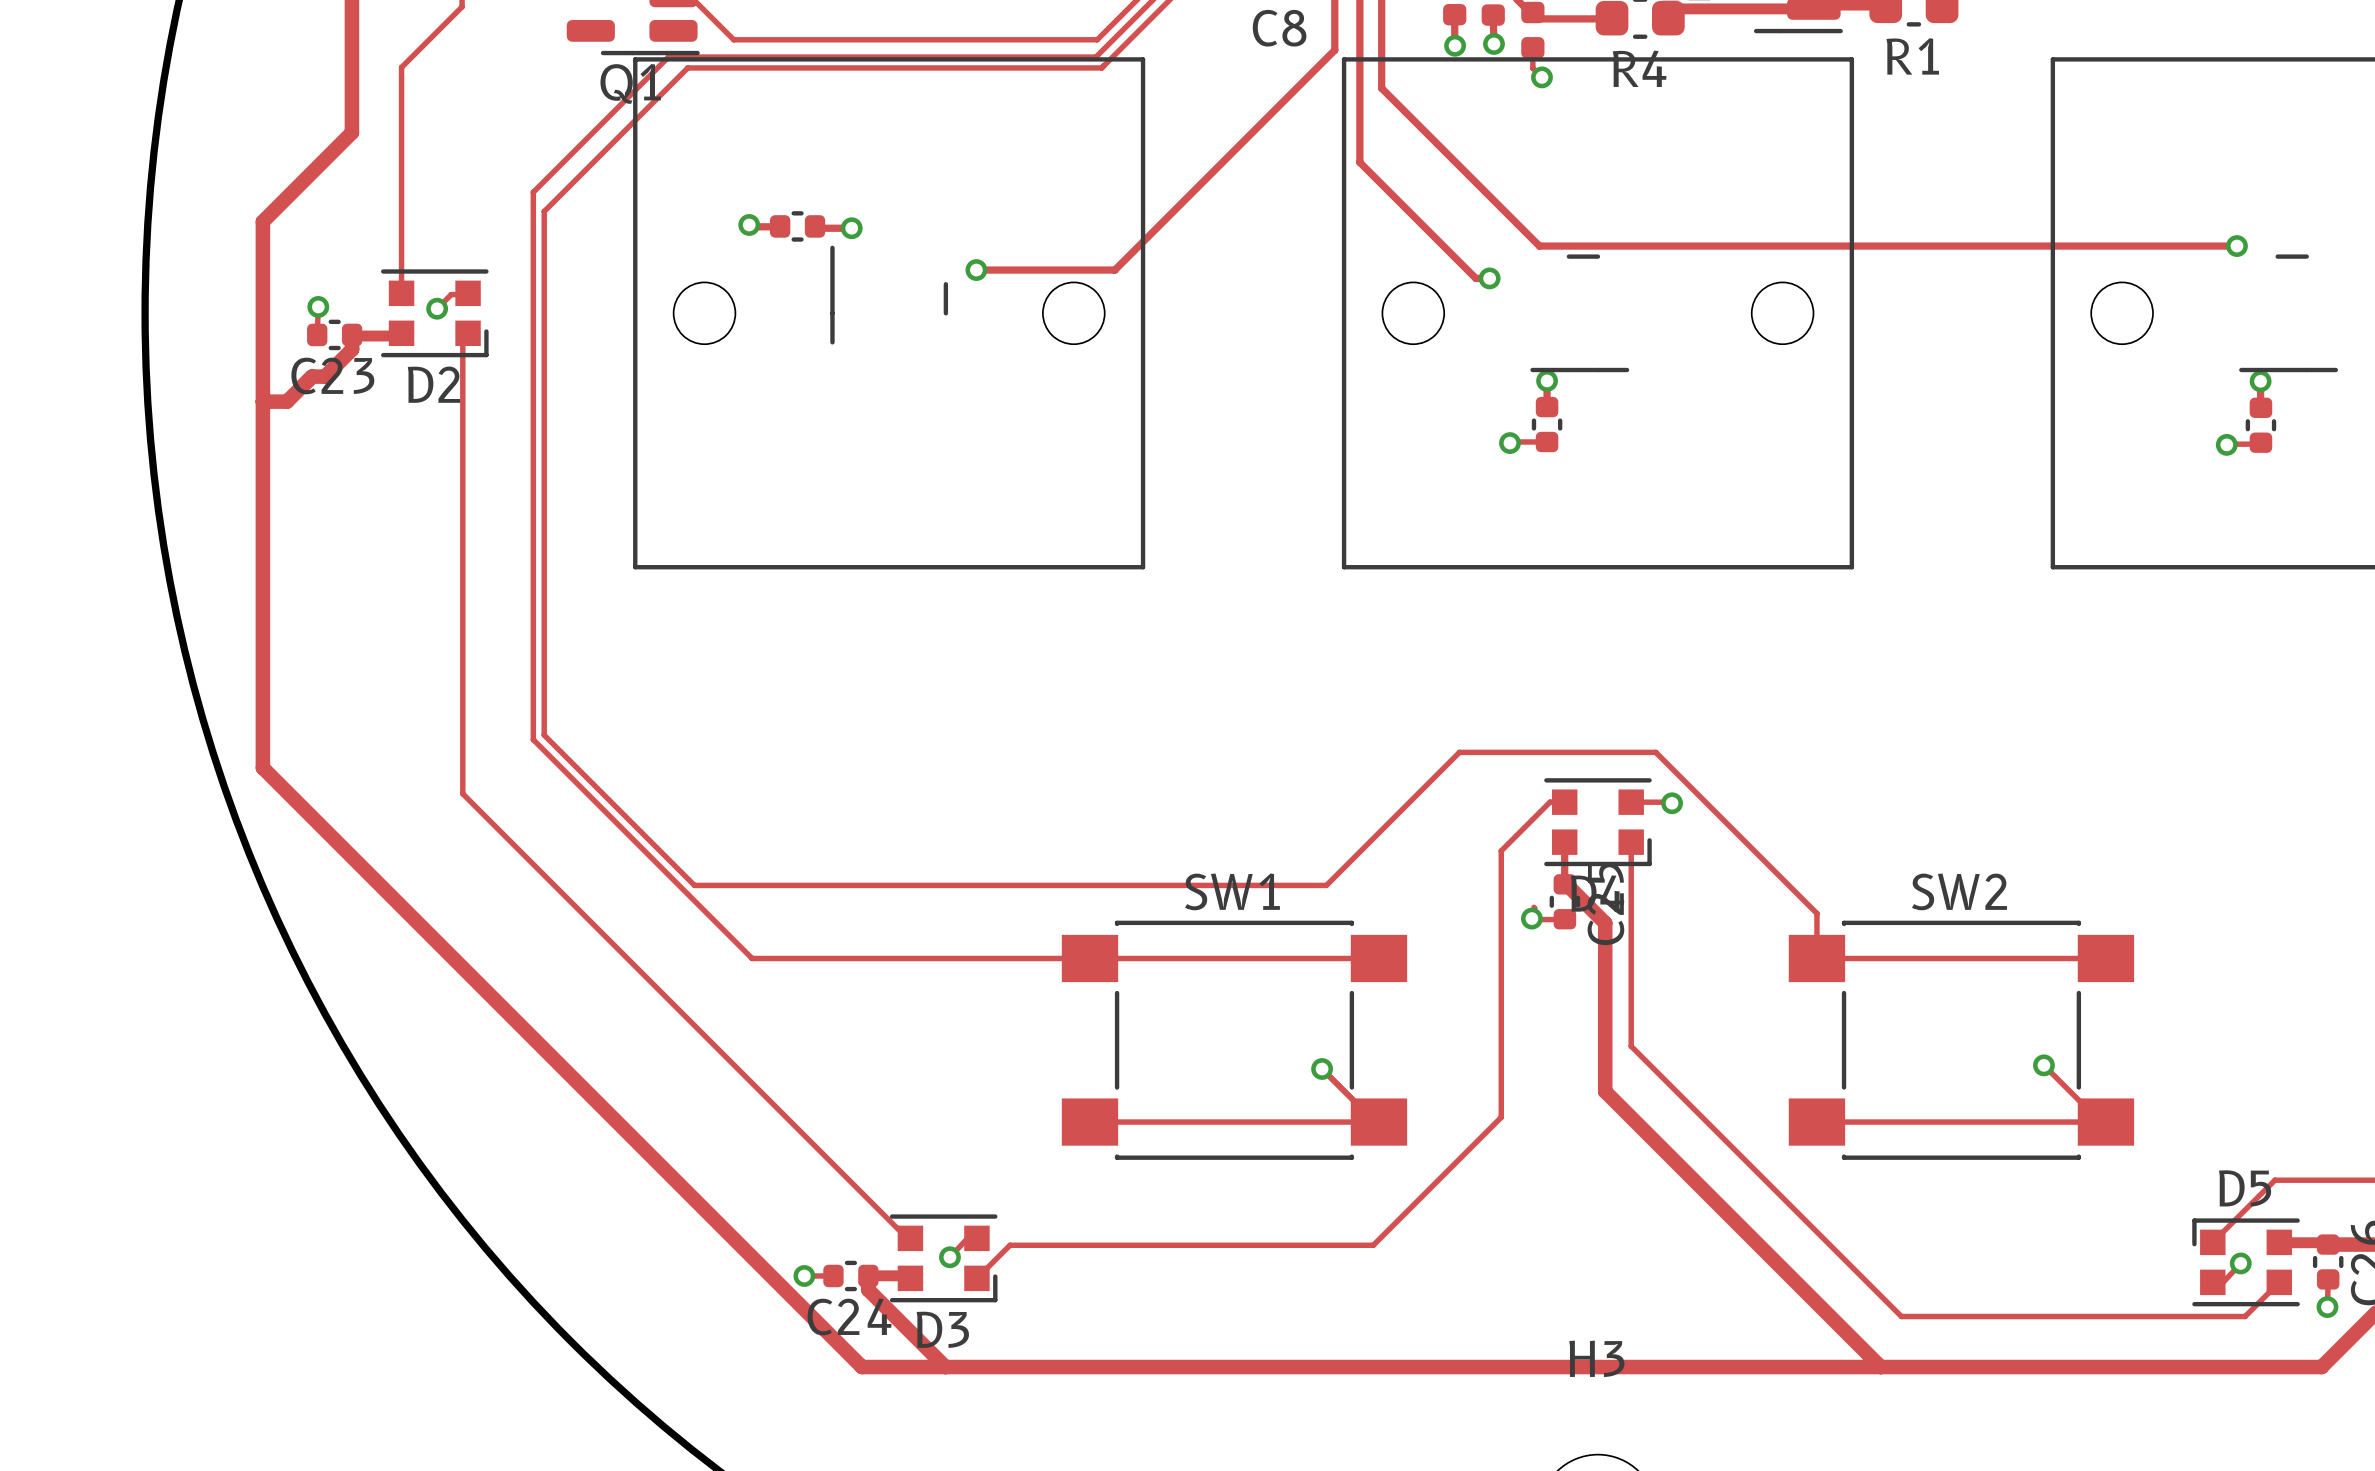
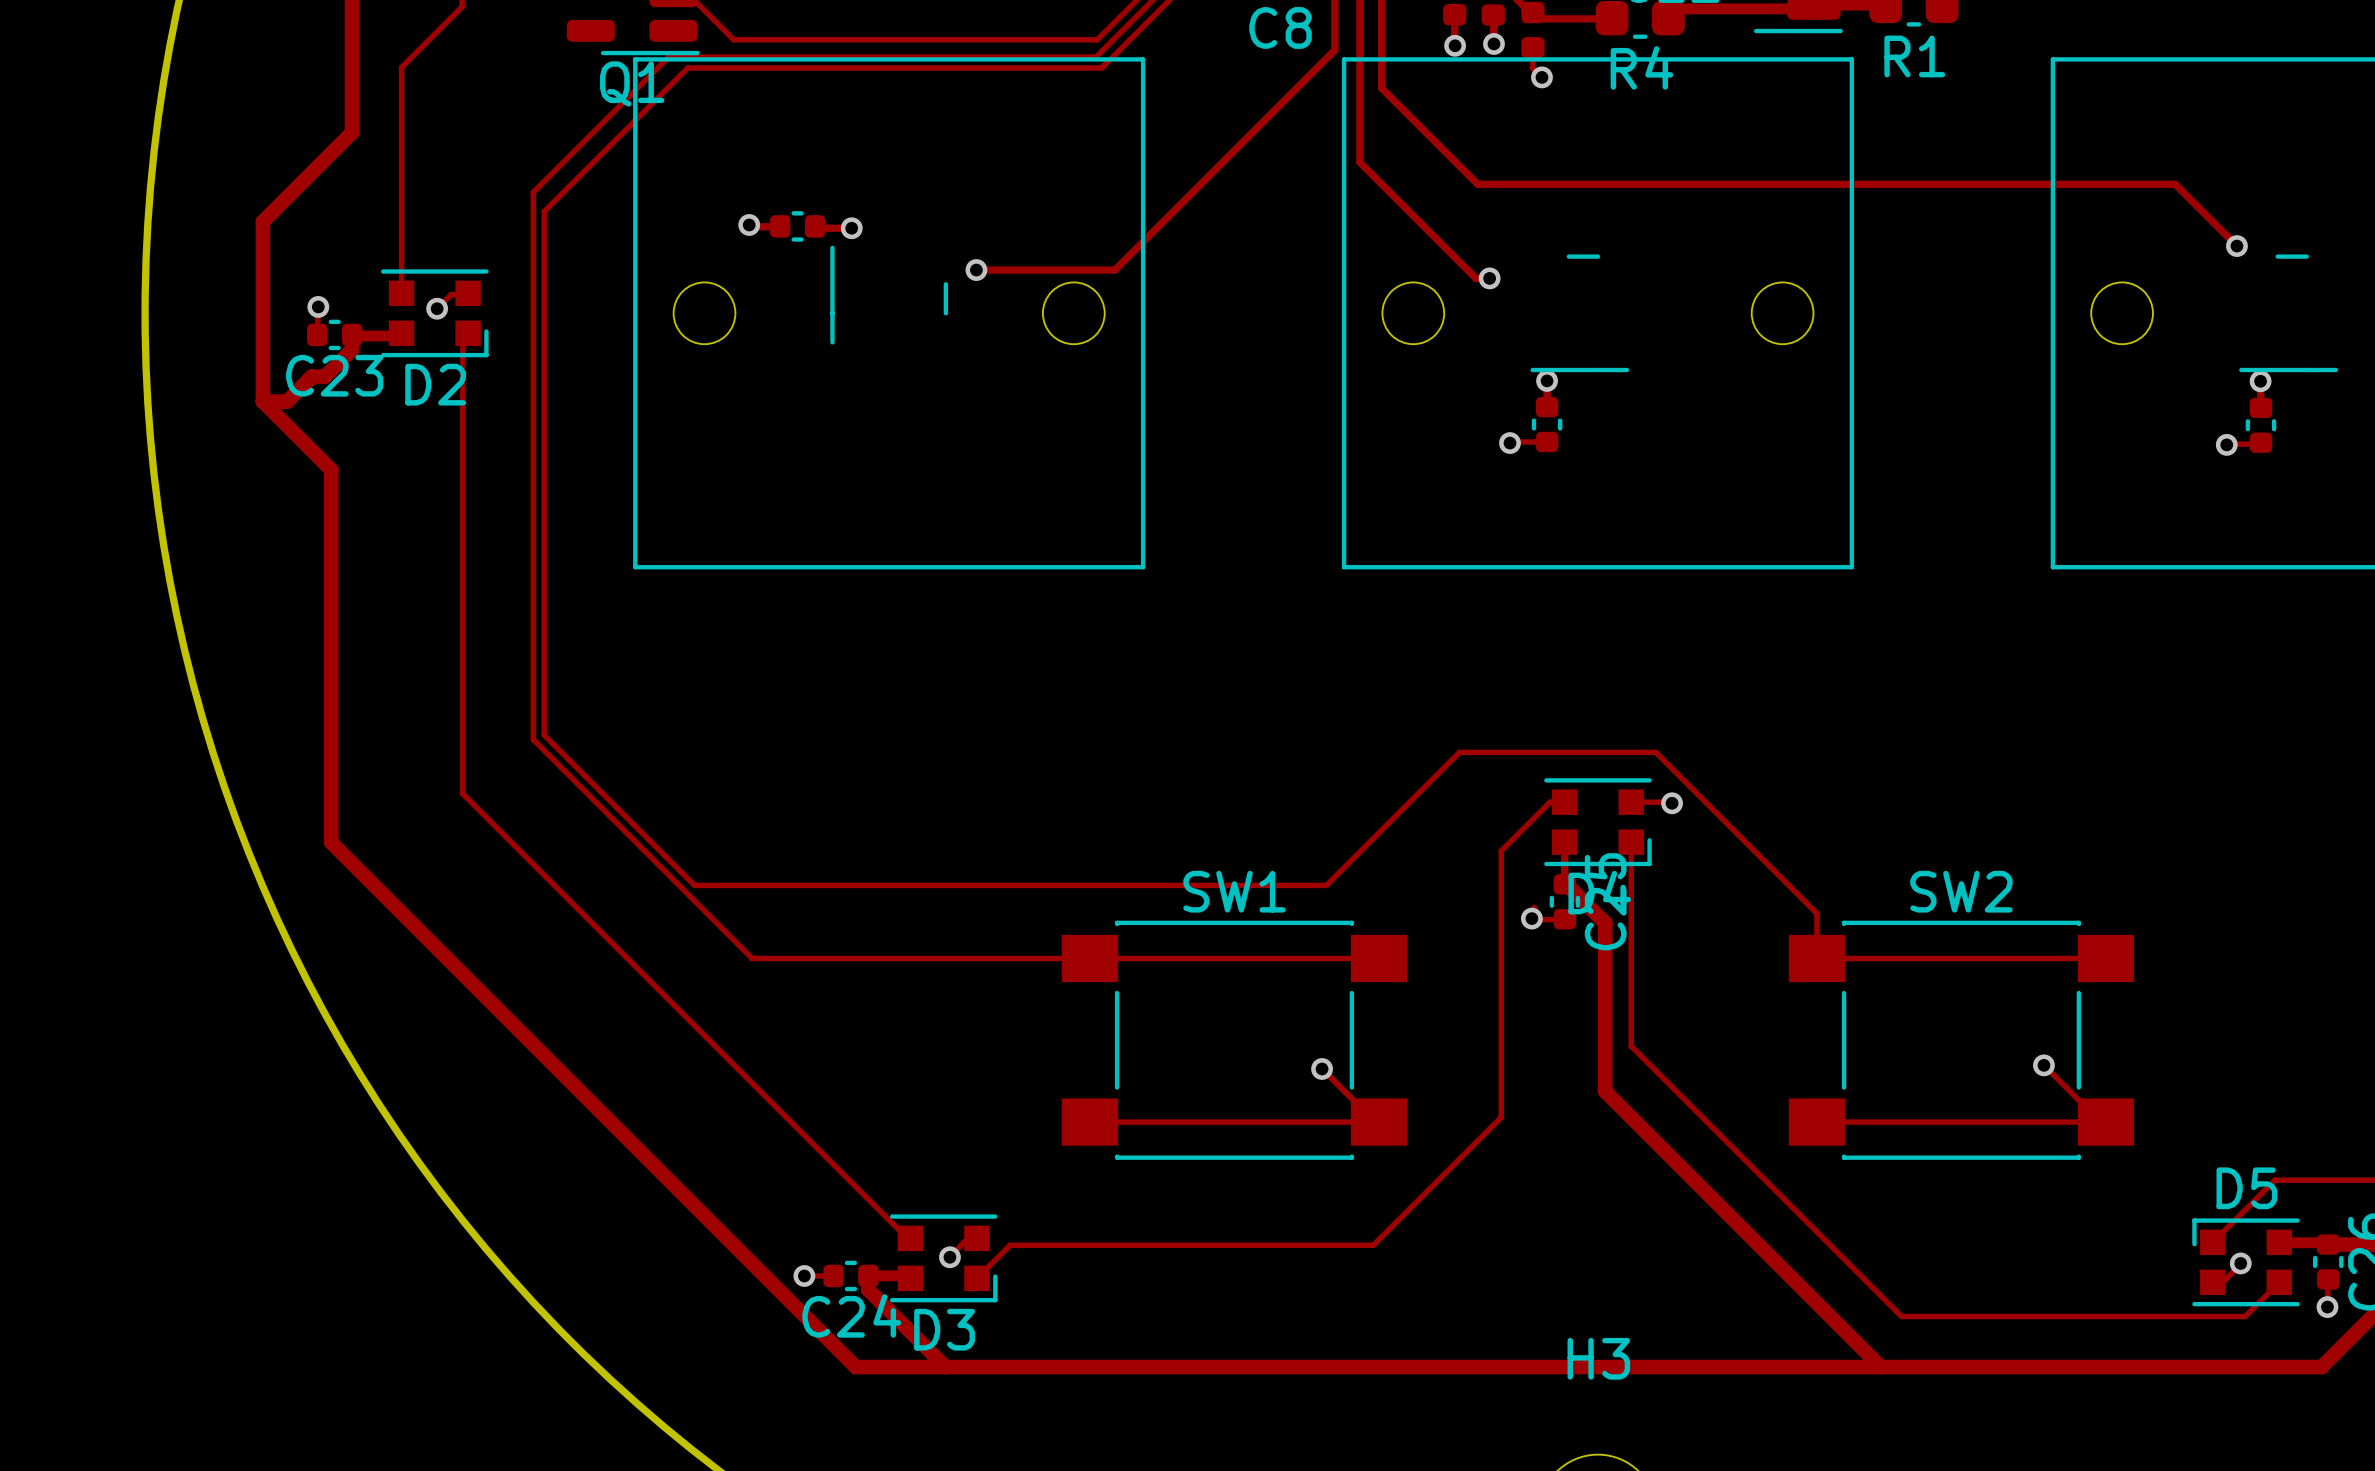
track: (1477, 184) (1539, 246) (2236, 246) -> (1477, 184) (2175, 184) (2236, 246)
track: (262, 401) (262, 767) (862, 1367) -> (262, 401) (331, 469) (331, 842) (855, 1367) (862, 1367)

